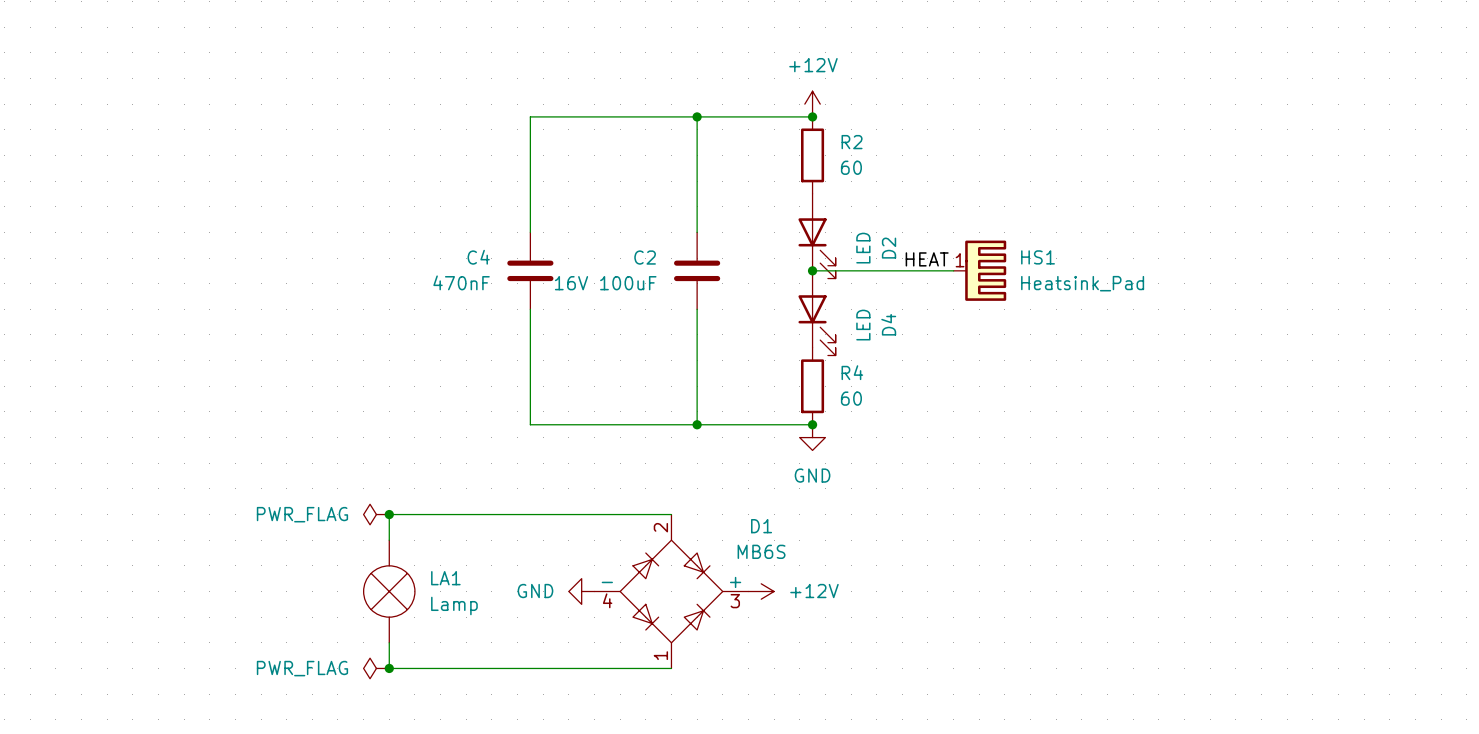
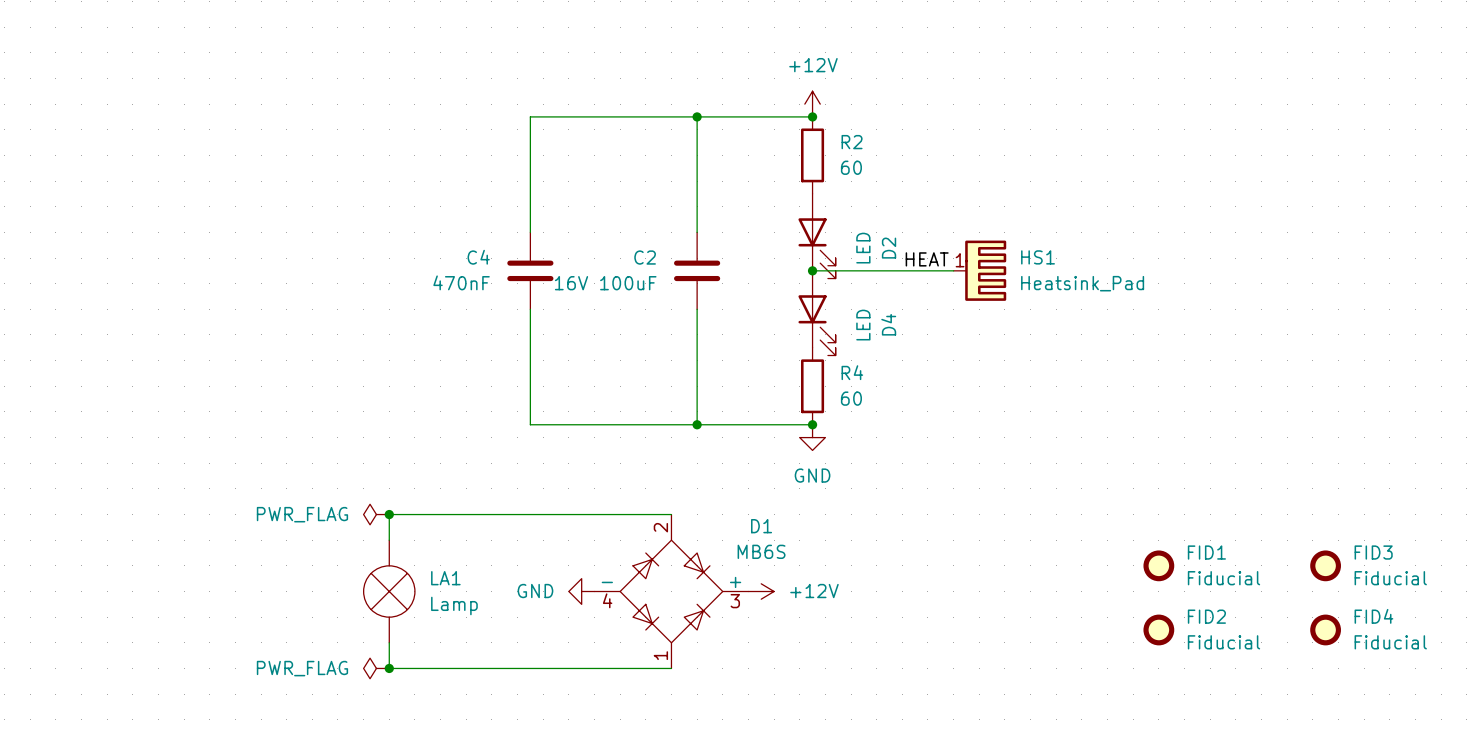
FID1: none -> Fiducial (1158, 565)
FID3: none -> Fiducial (1325, 565)
FID2: none -> Fiducial (1158, 629)
FID4: none -> Fiducial (1325, 629)

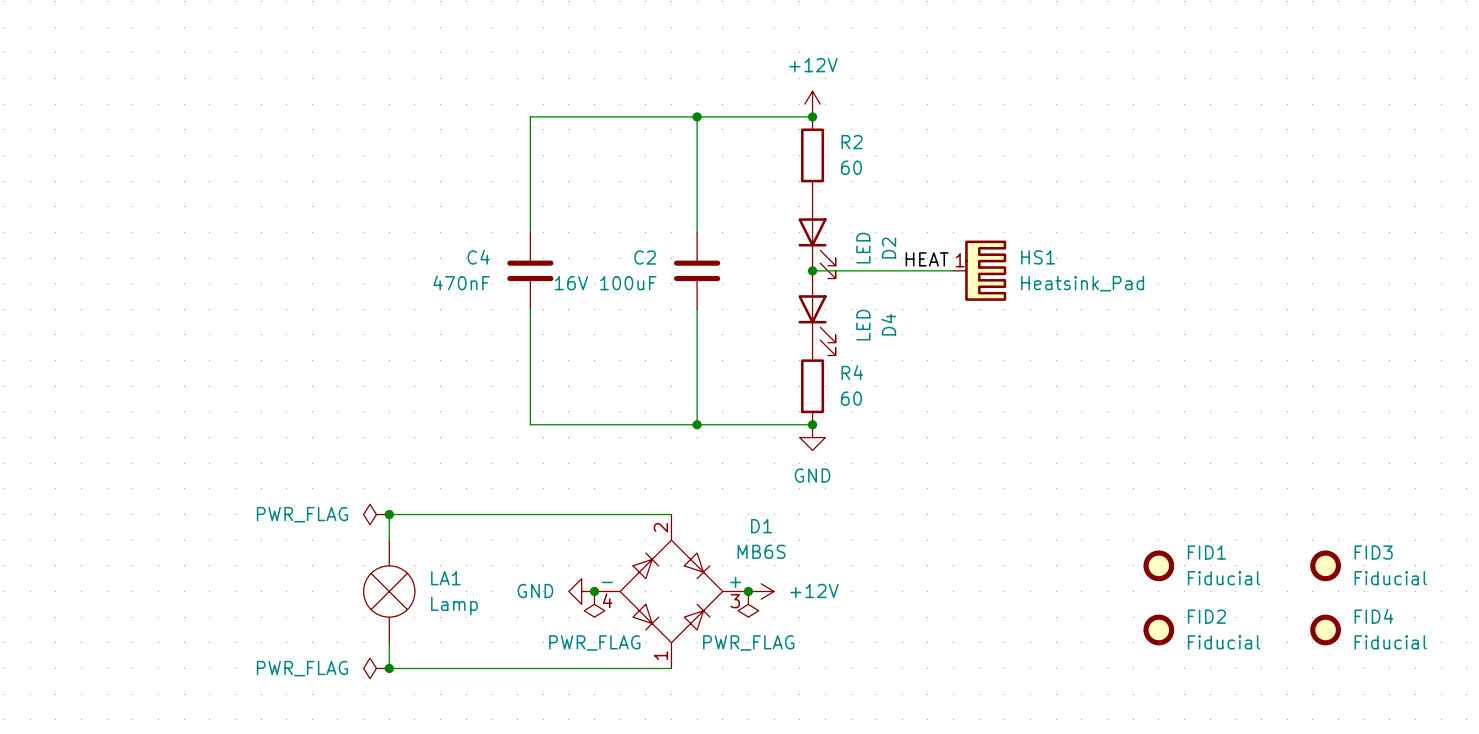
junction: none -> (594, 591)
junction: none -> (748, 591)
power symbol: none -> PWR_FLAG (594, 604)
power symbol: none -> PWR_FLAG (748, 604)

